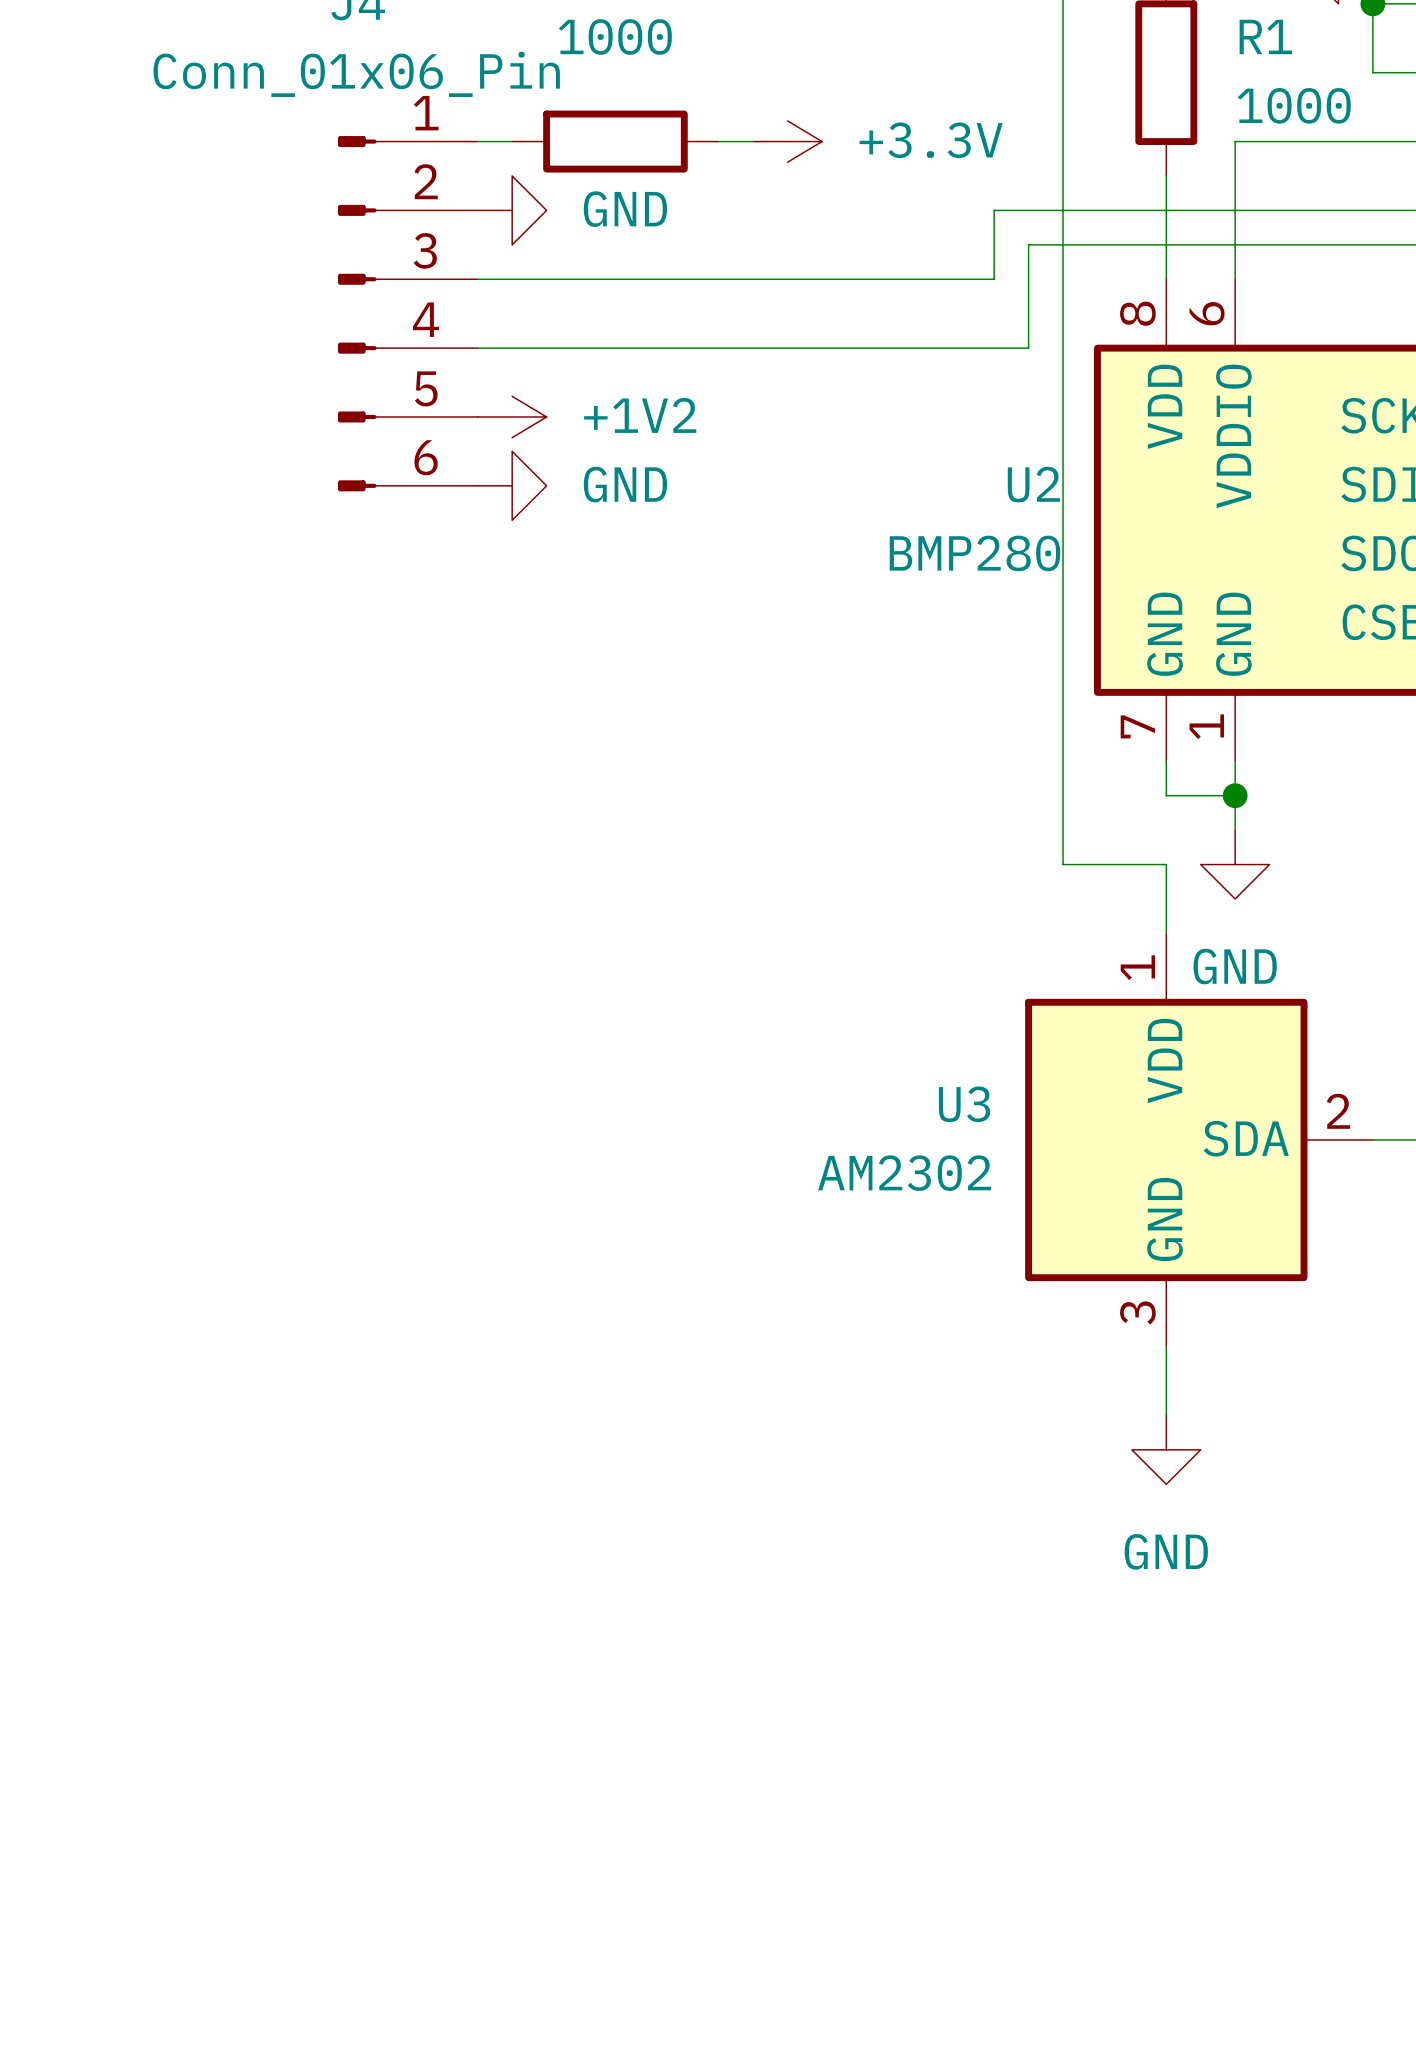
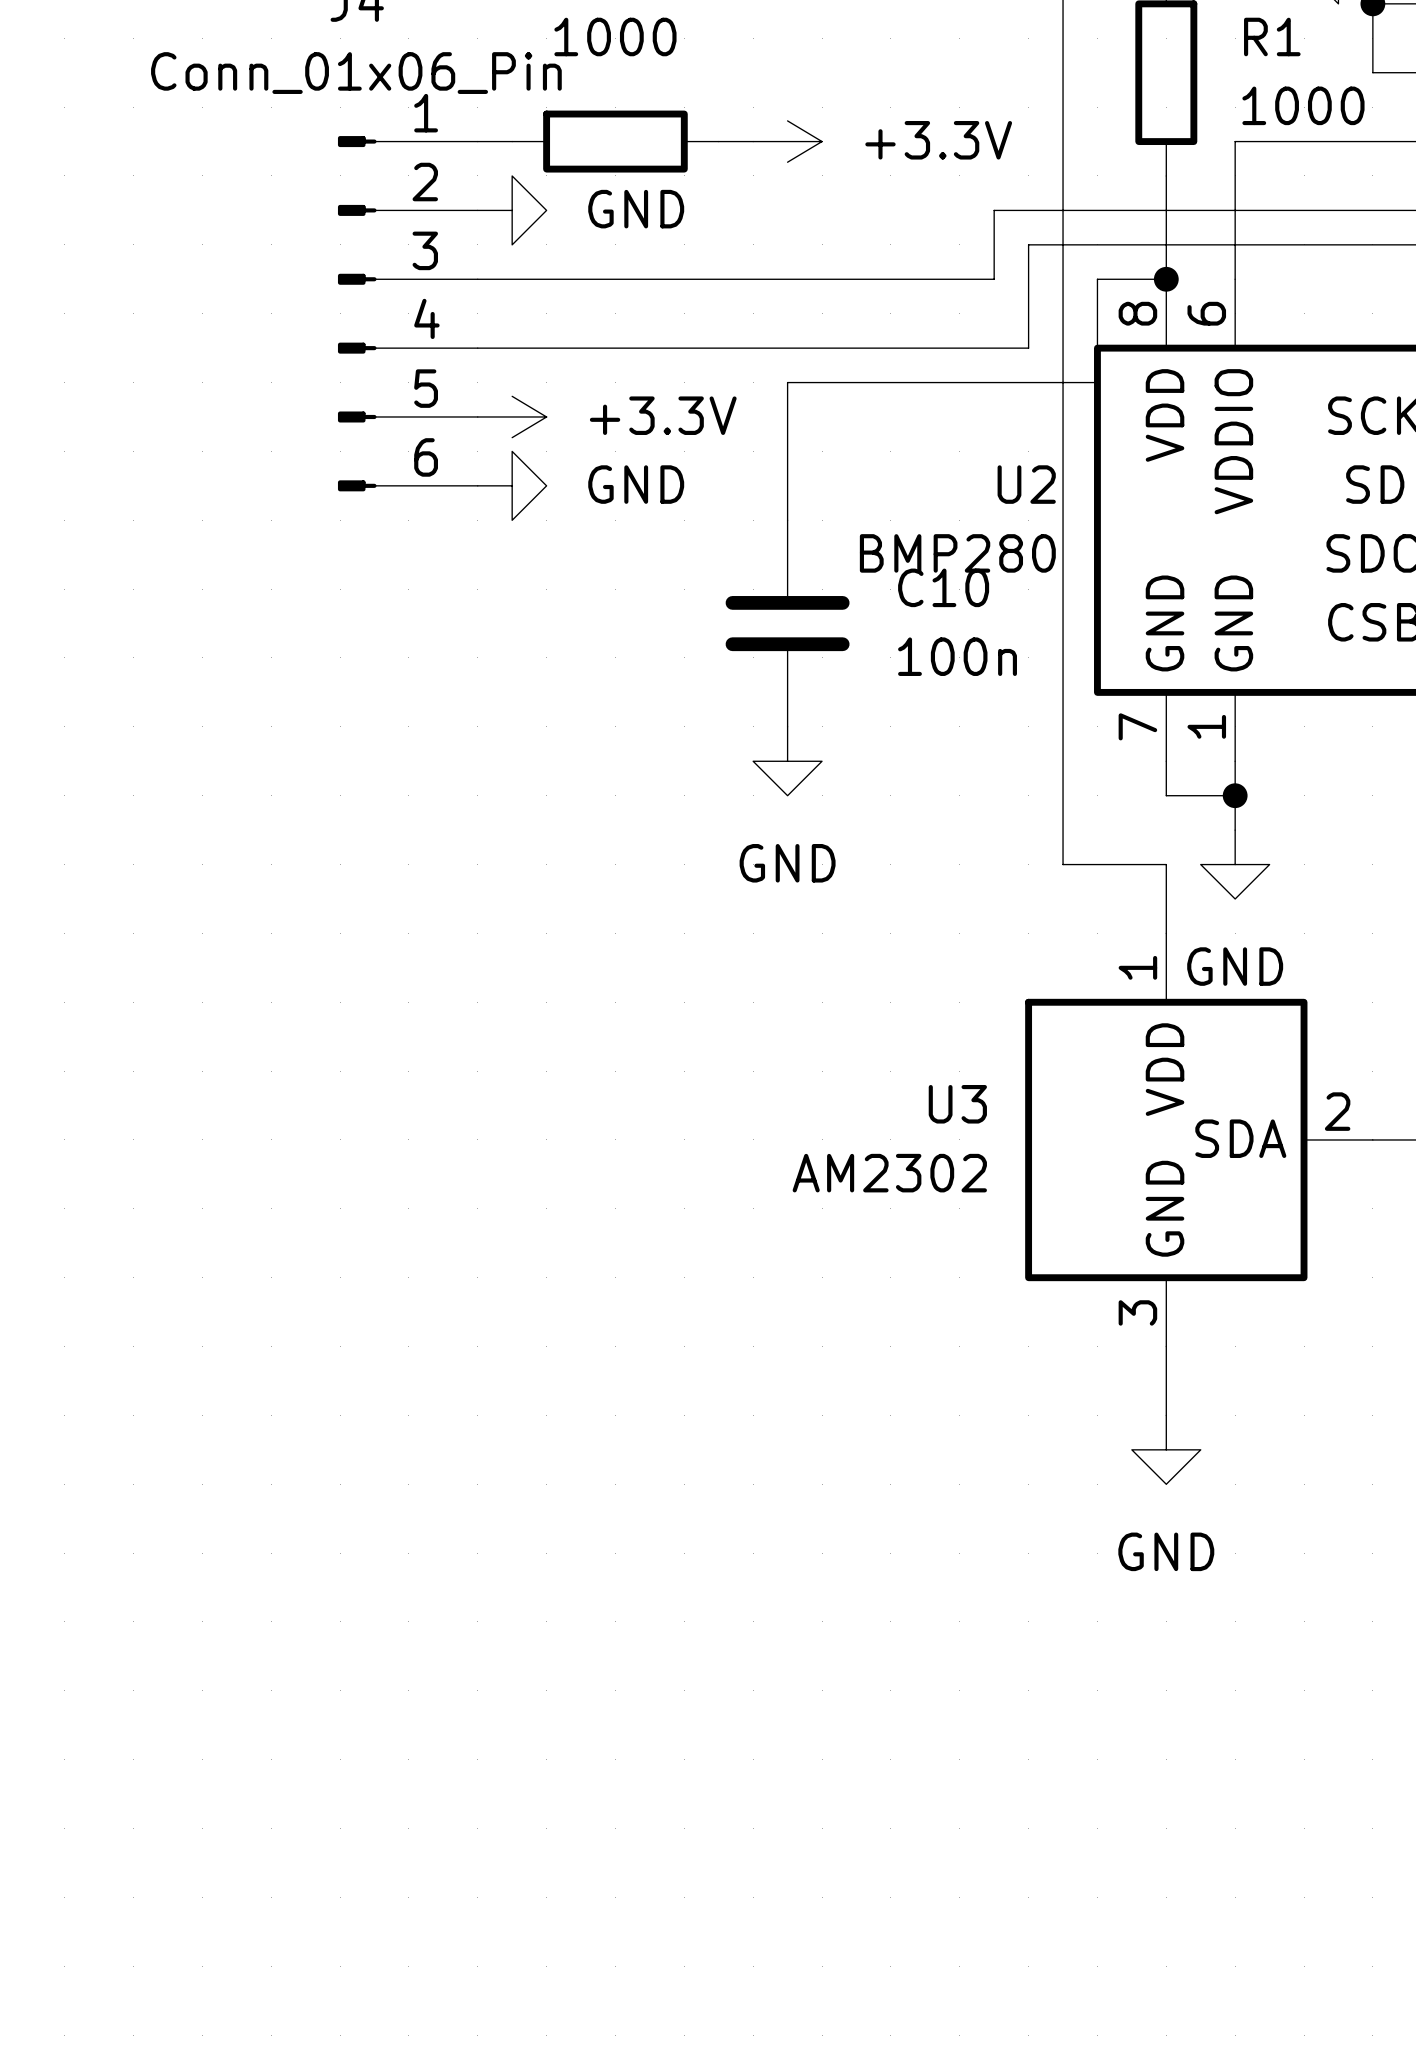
wire: none -> (1166, 279) (1097, 279) (1097, 382) (787, 382) (787, 520)
junction: none -> (1166, 279)
power symbol: +1V2 (512, 416) -> +3.3V (512, 416)
C10: none -> 100n (787, 623)
power symbol: none -> GND (787, 761)

